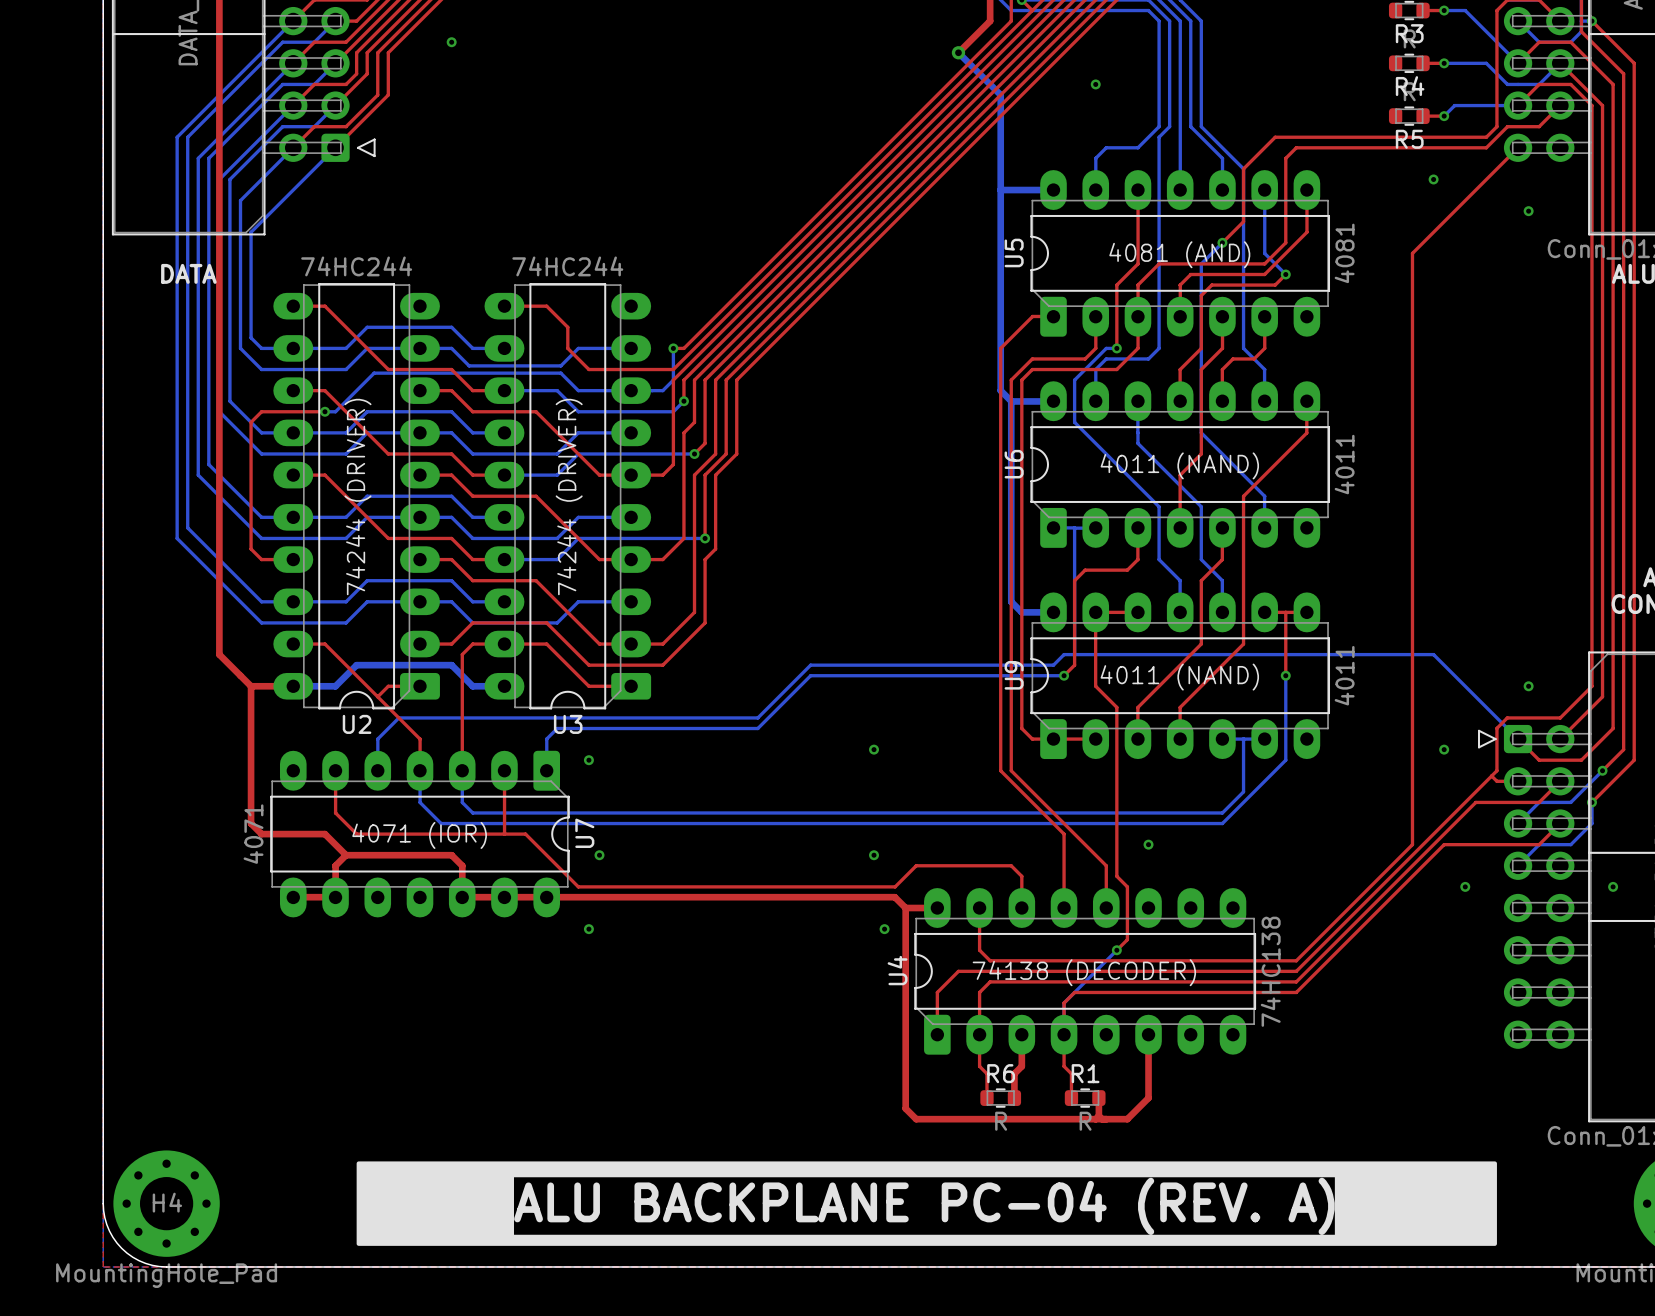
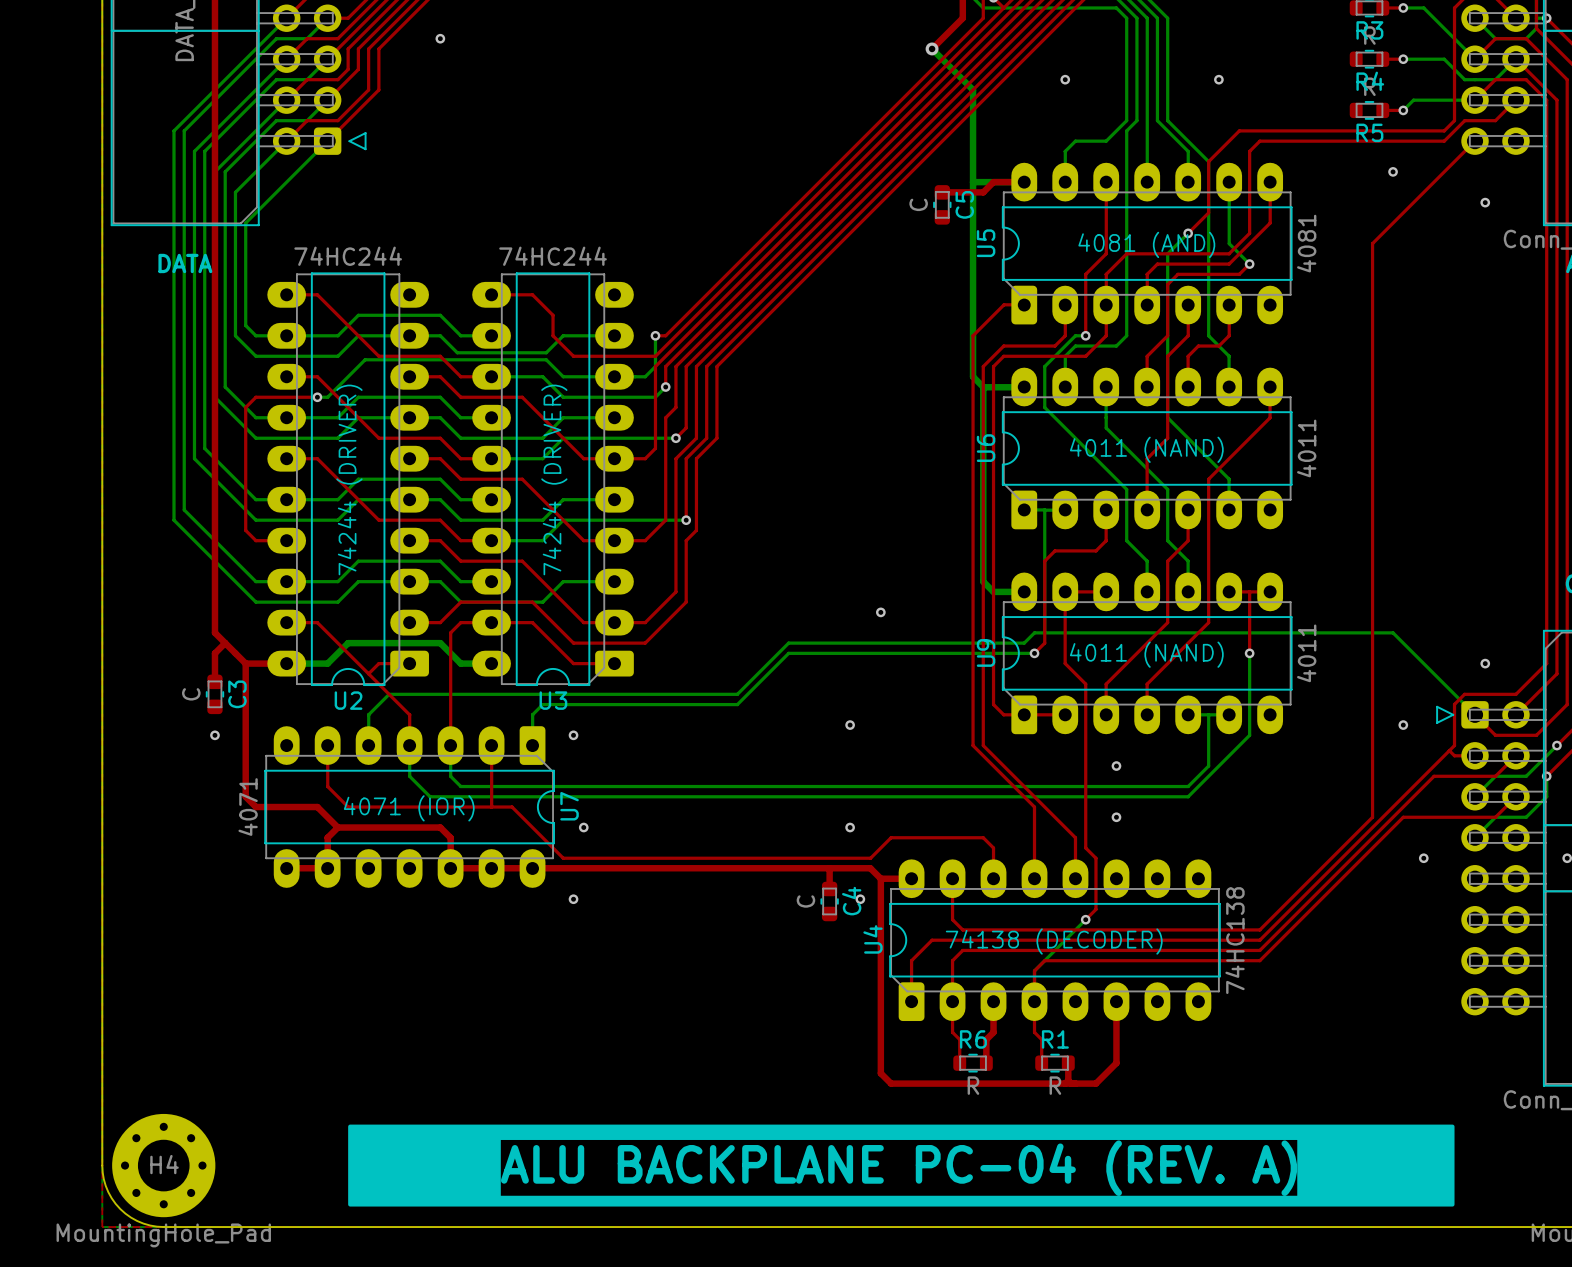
via: none -> (1218, 79)
top track: none -> (1024, 182) (993, 182) (983, 192) (942, 192)
C5: none -> C (942, 204)
via: none -> (880, 612)
top track: none -> (225, 643) (214, 653) (214, 681)
C3: none -> C (214, 694)
via: none -> (214, 735)
via: none -> (1116, 766)
top track: none -> (829, 868) (829, 888)
C4: none -> C (829, 901)

